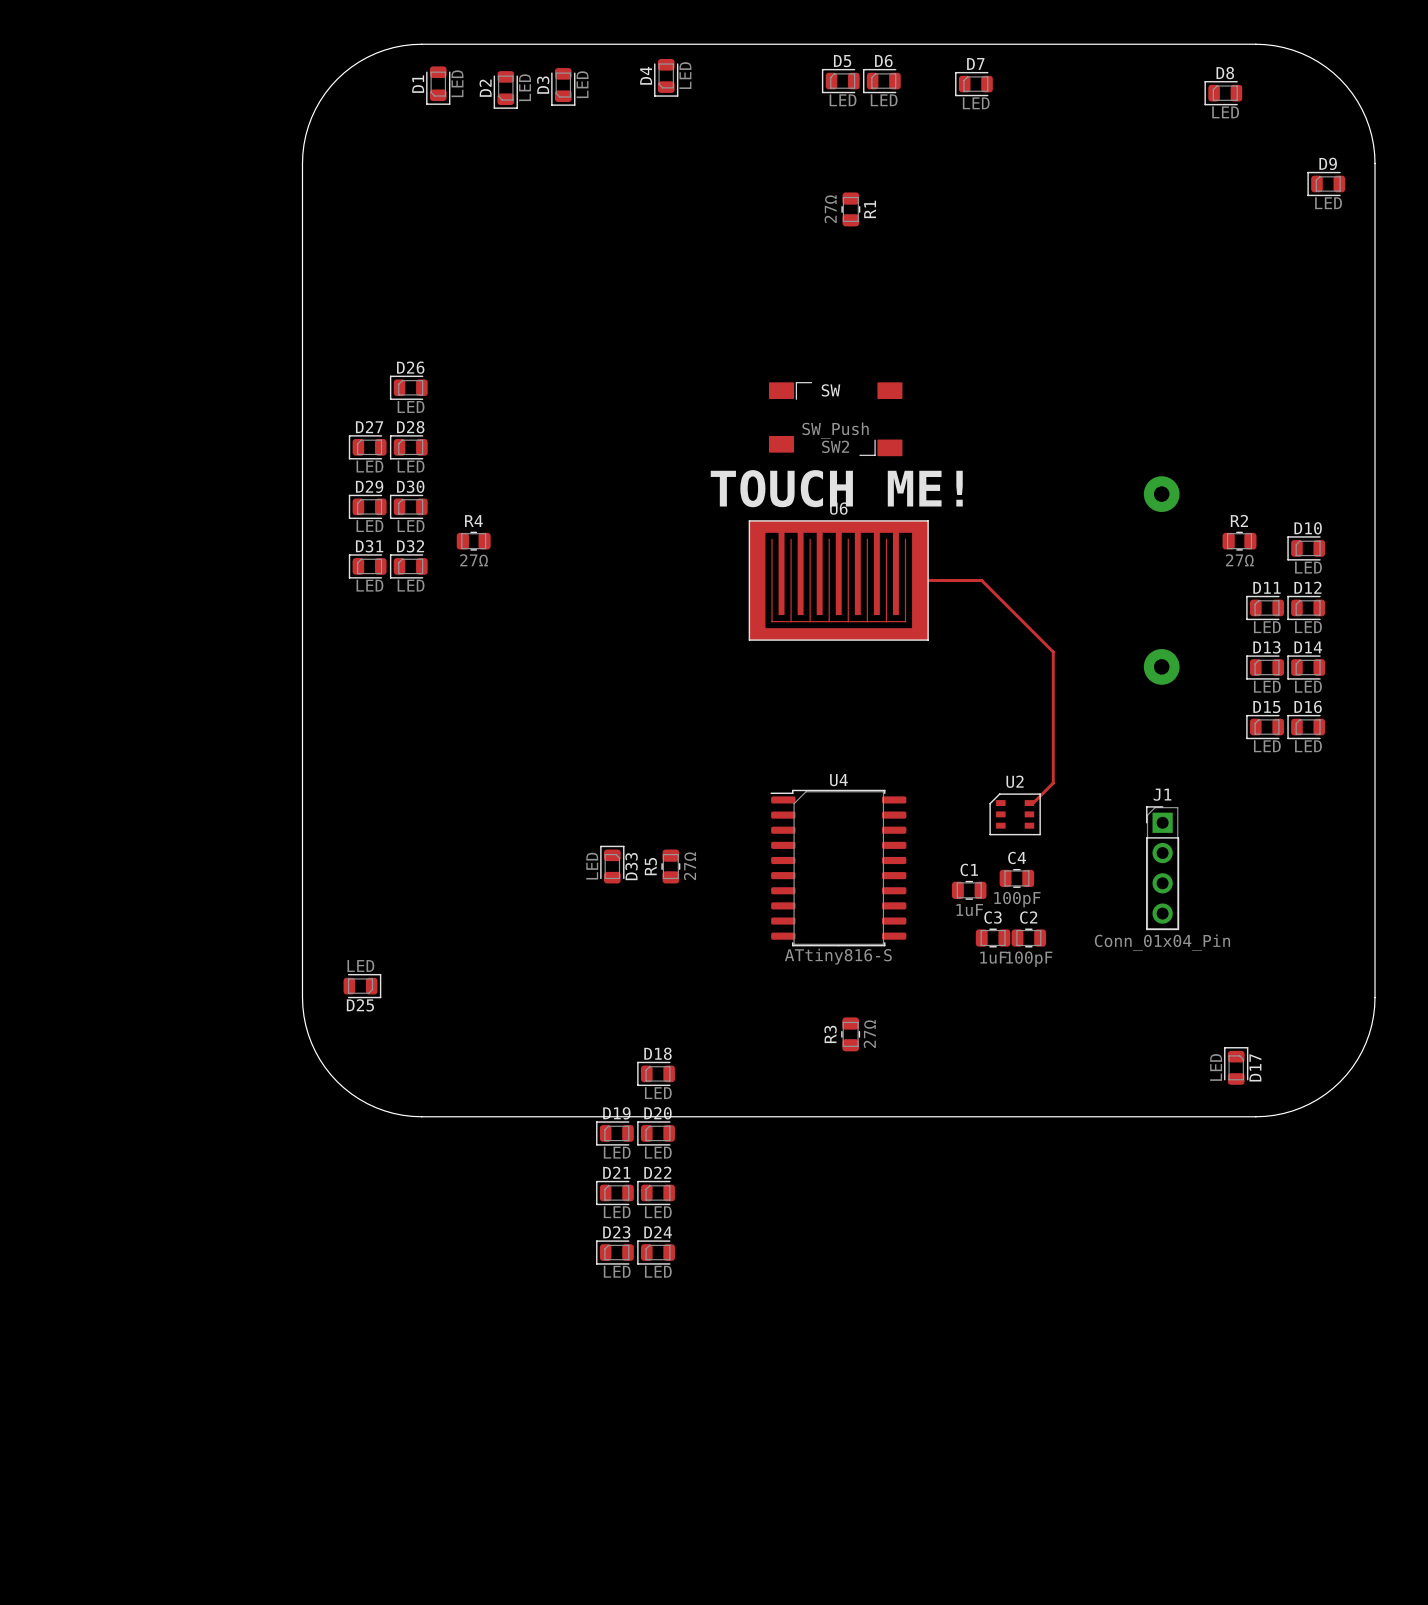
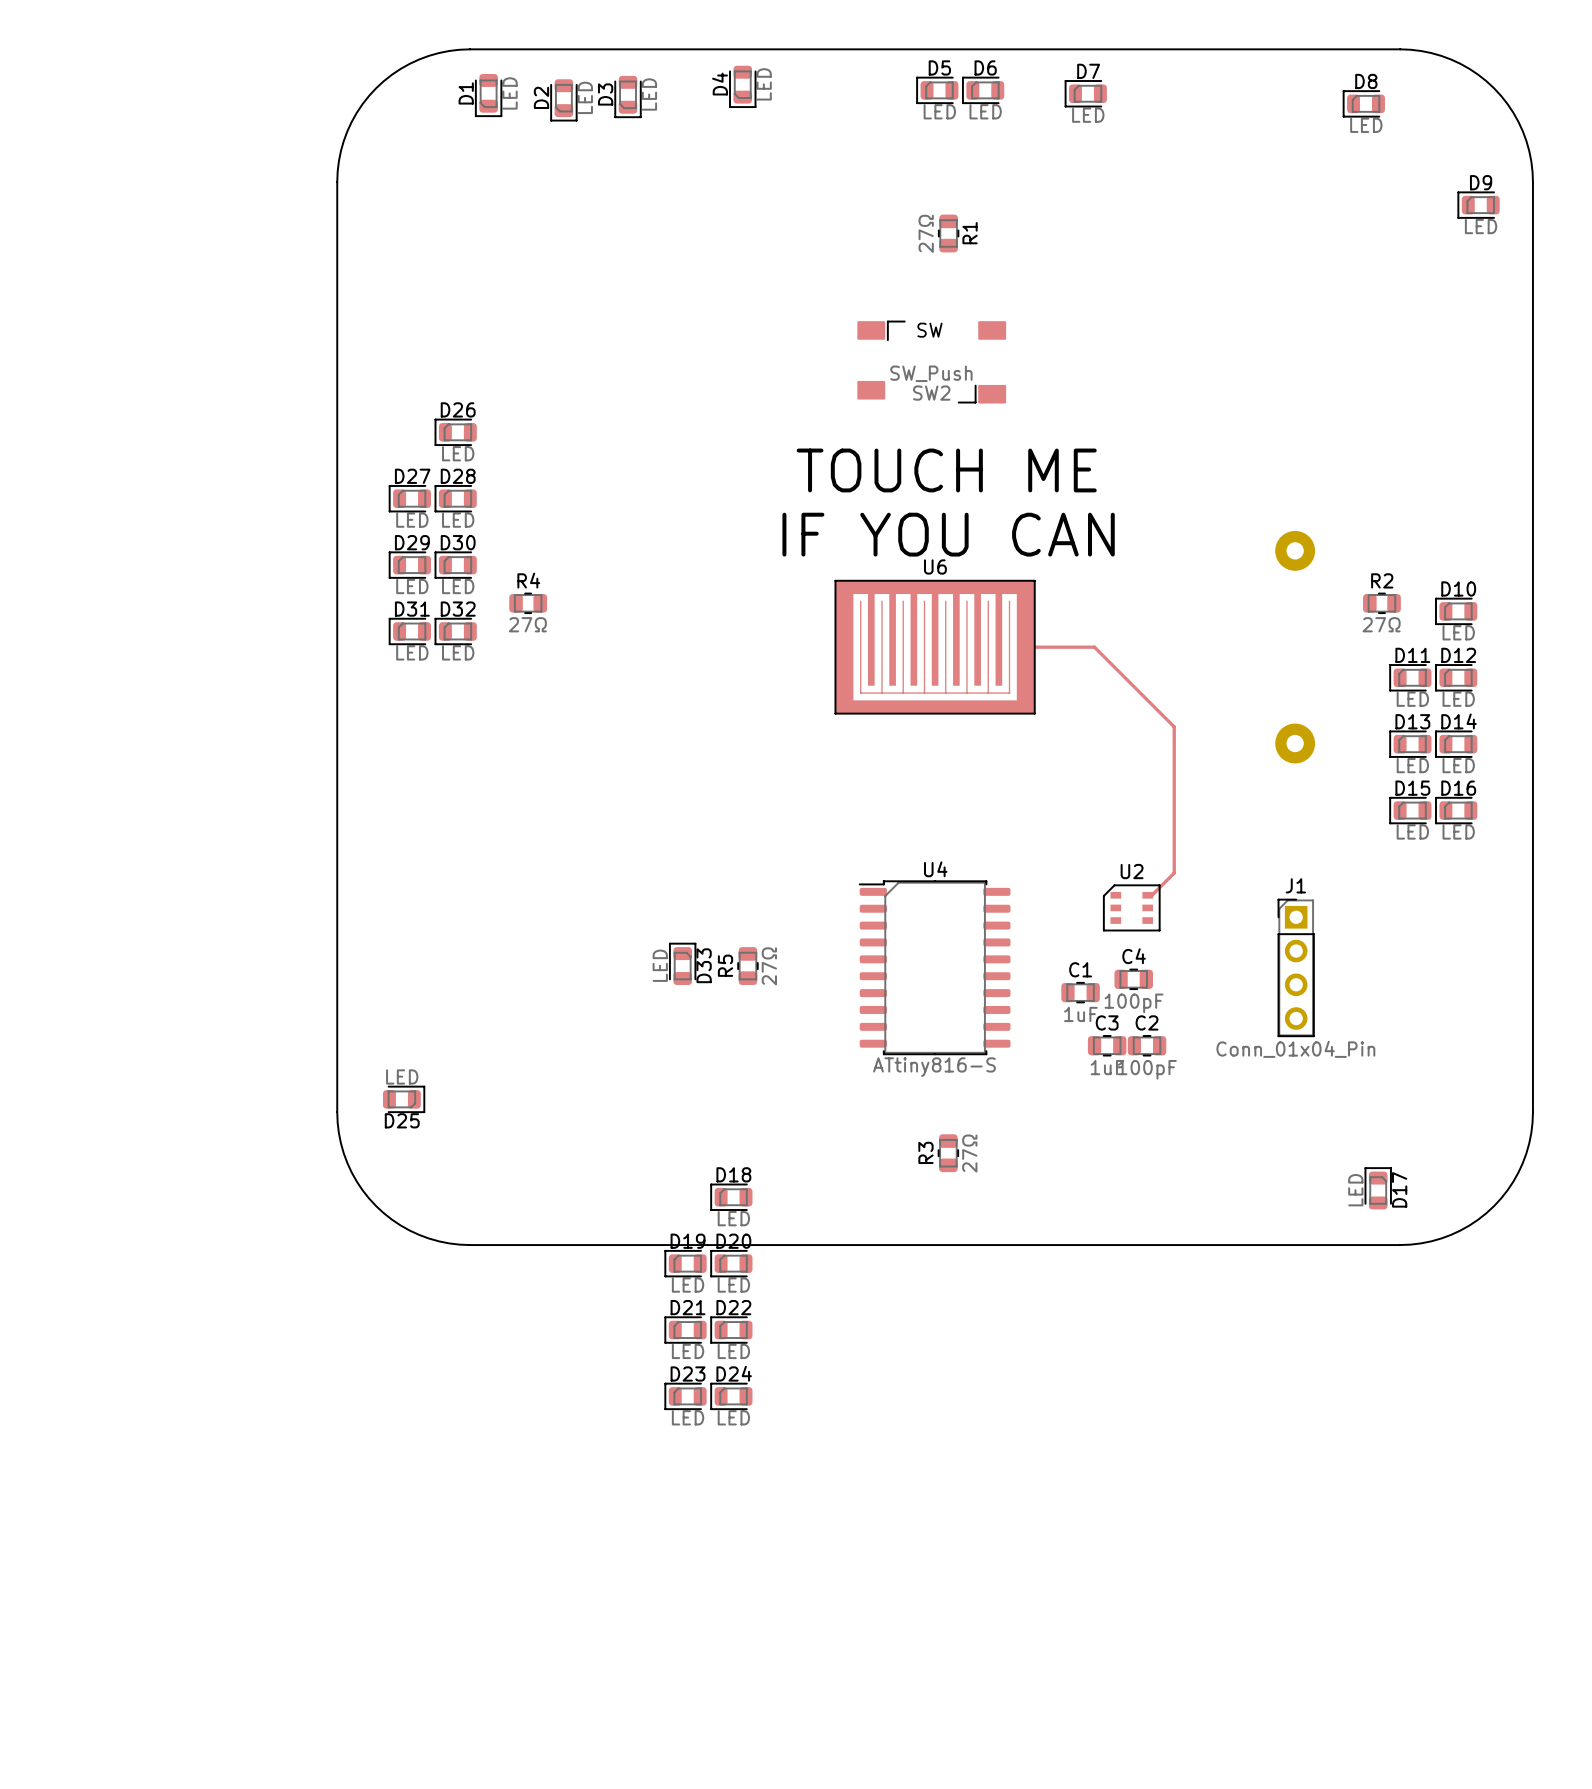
SW2 position: (835, 419) -> (931, 362)
text: none -> IF YOU CAN (948, 534)
text: TOUCH ME! (836, 488) -> TOUCH ME (946, 470)

